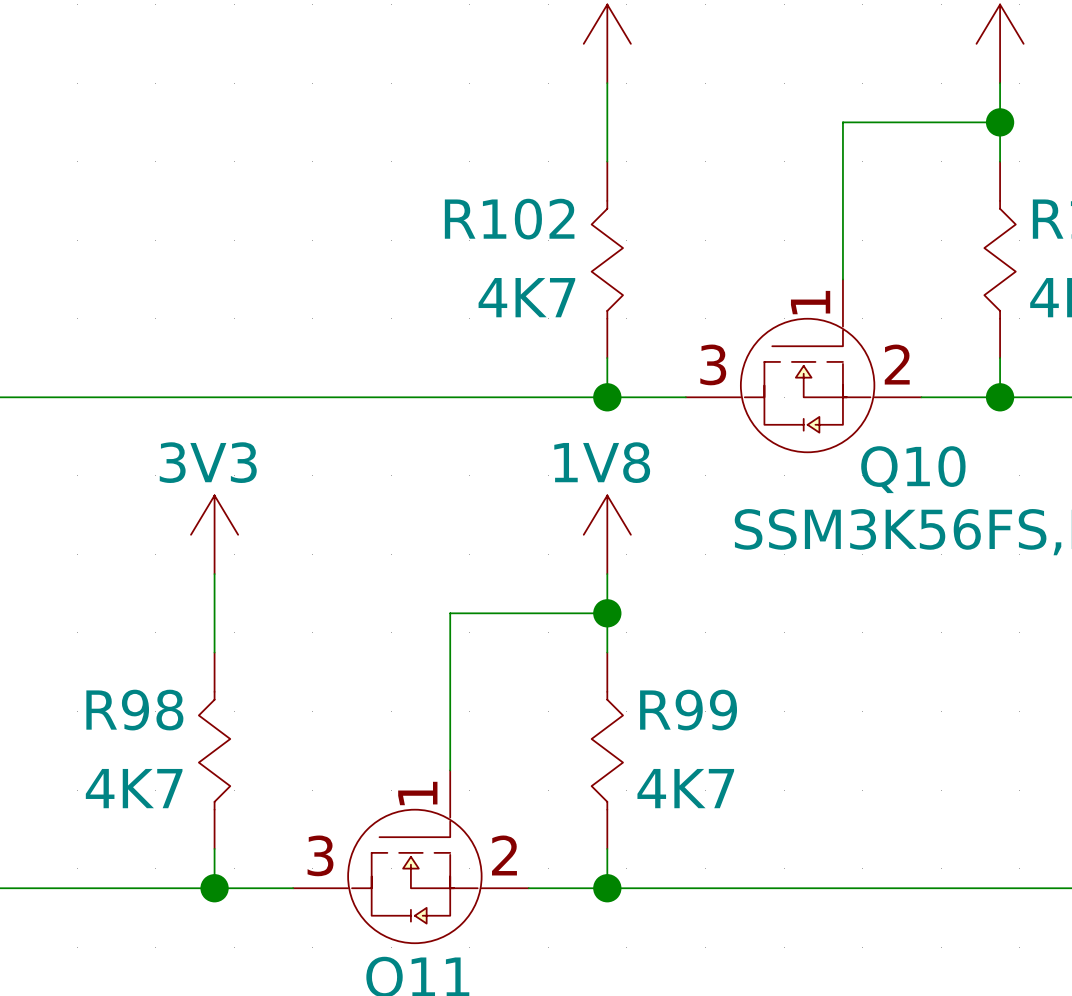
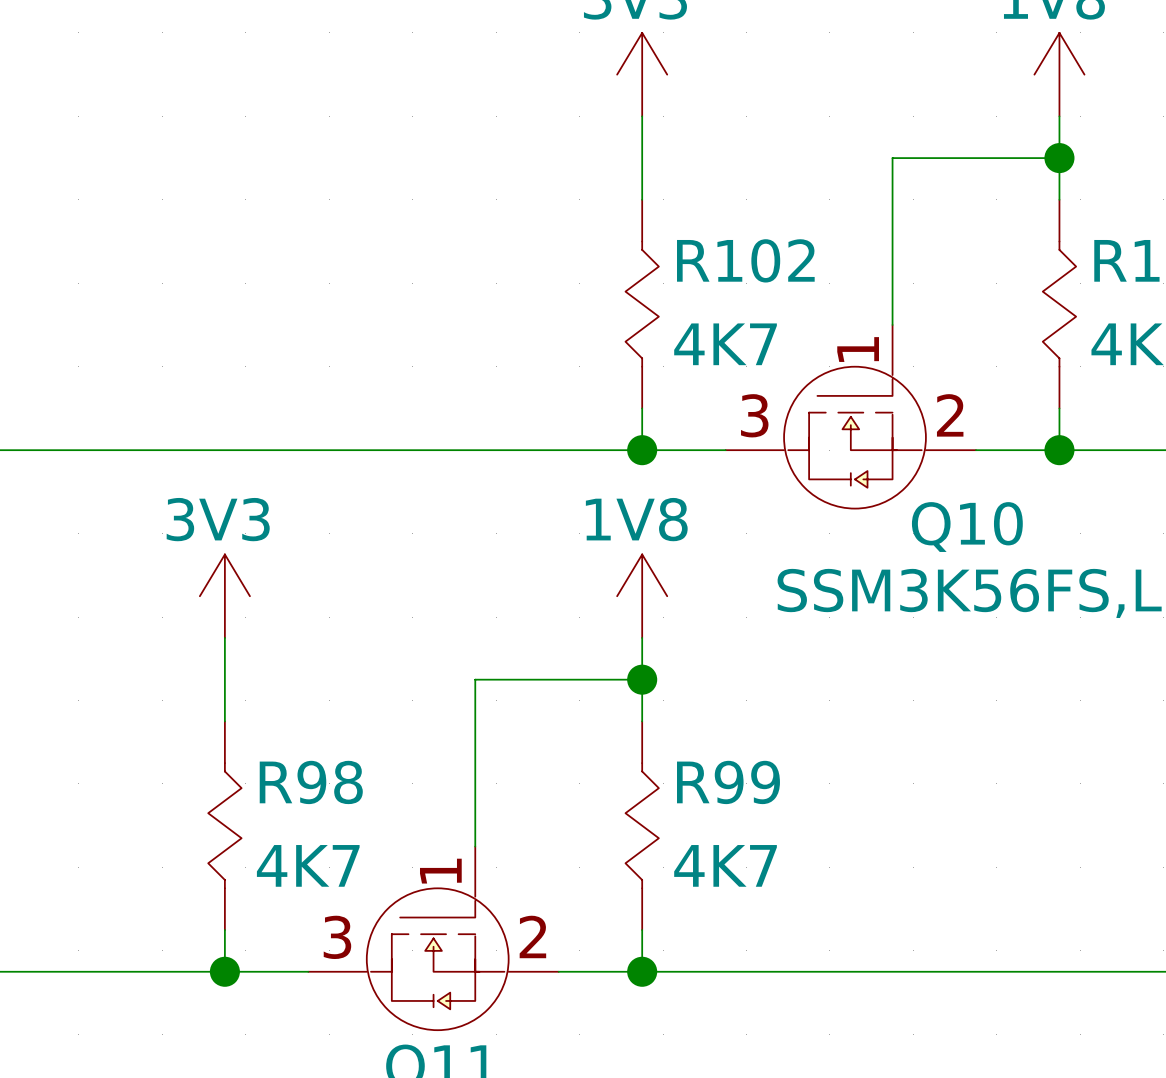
R102 flip: as is (607, 259) -> left-right (642, 304)
R98 flip: as is (214, 750) -> left-right (224, 825)

